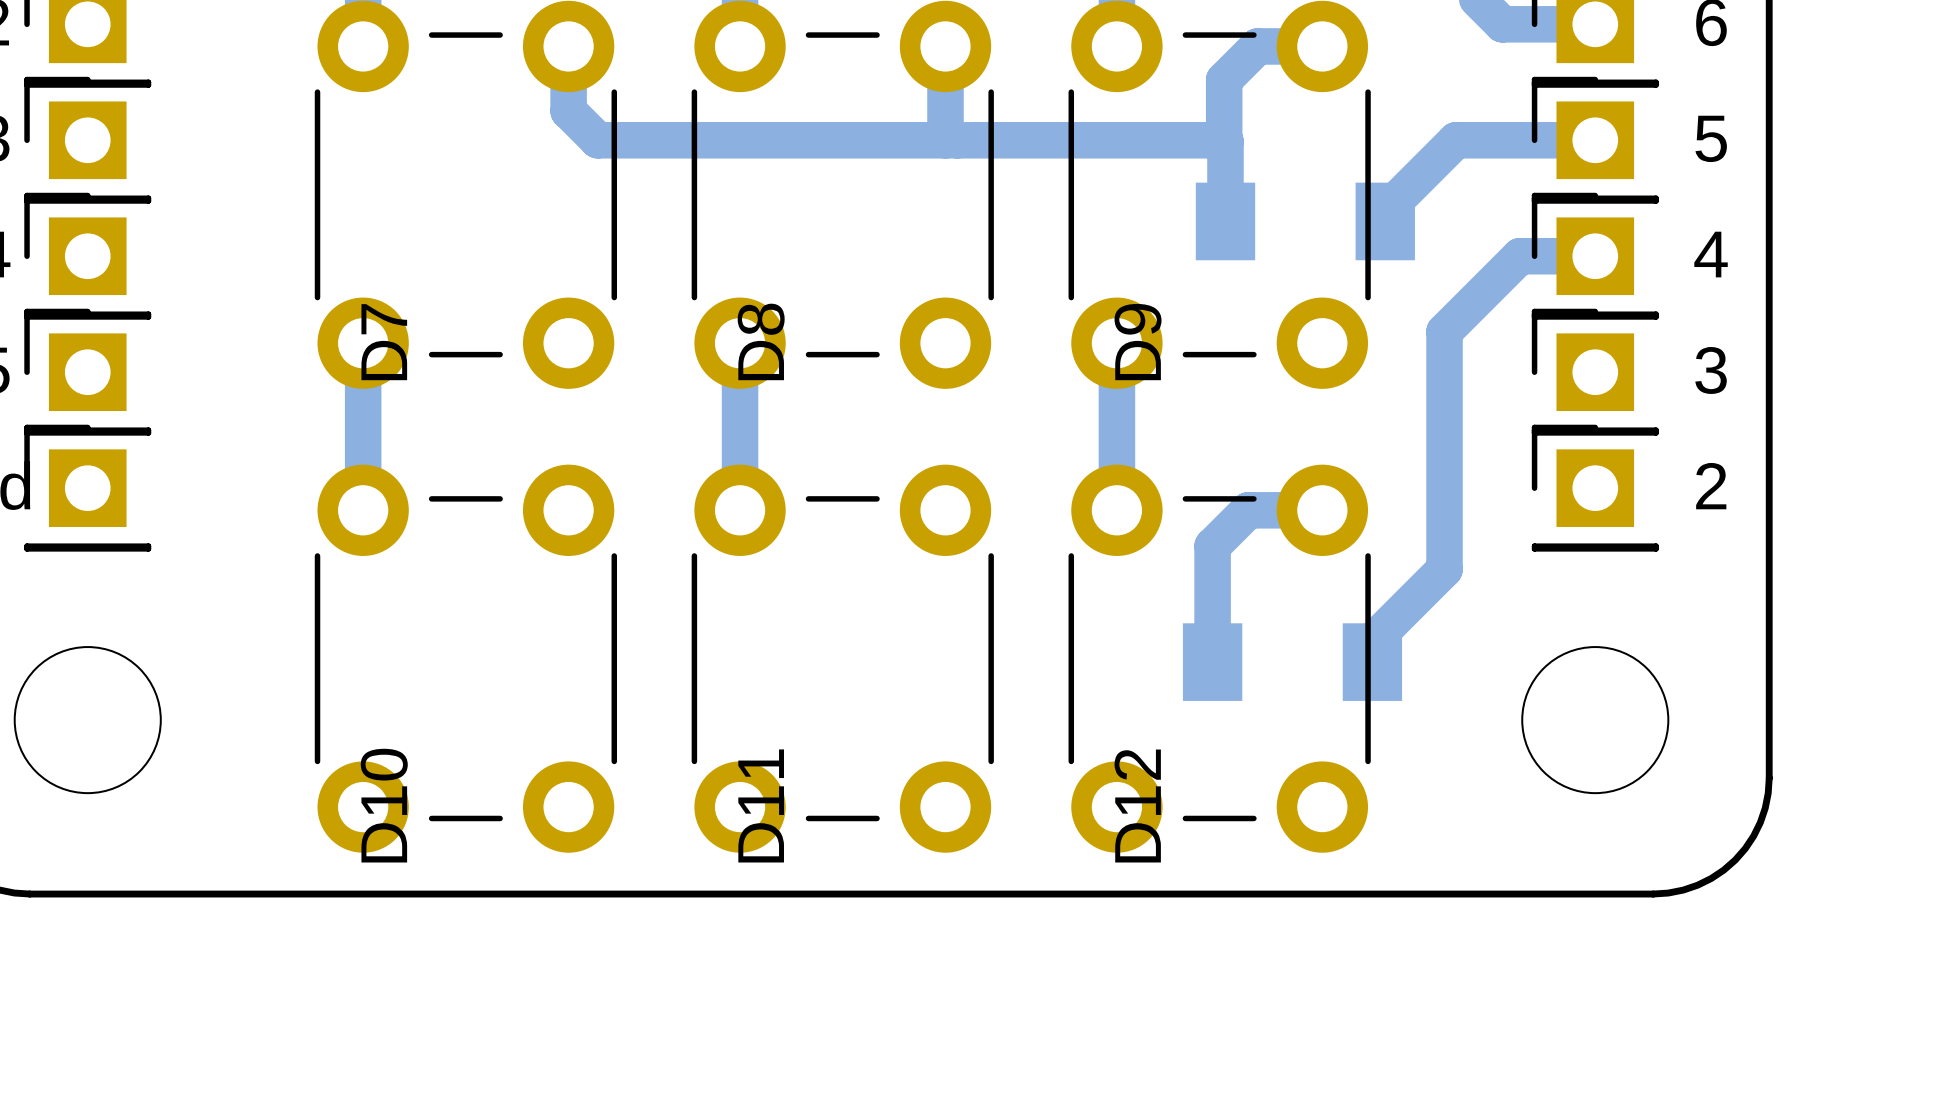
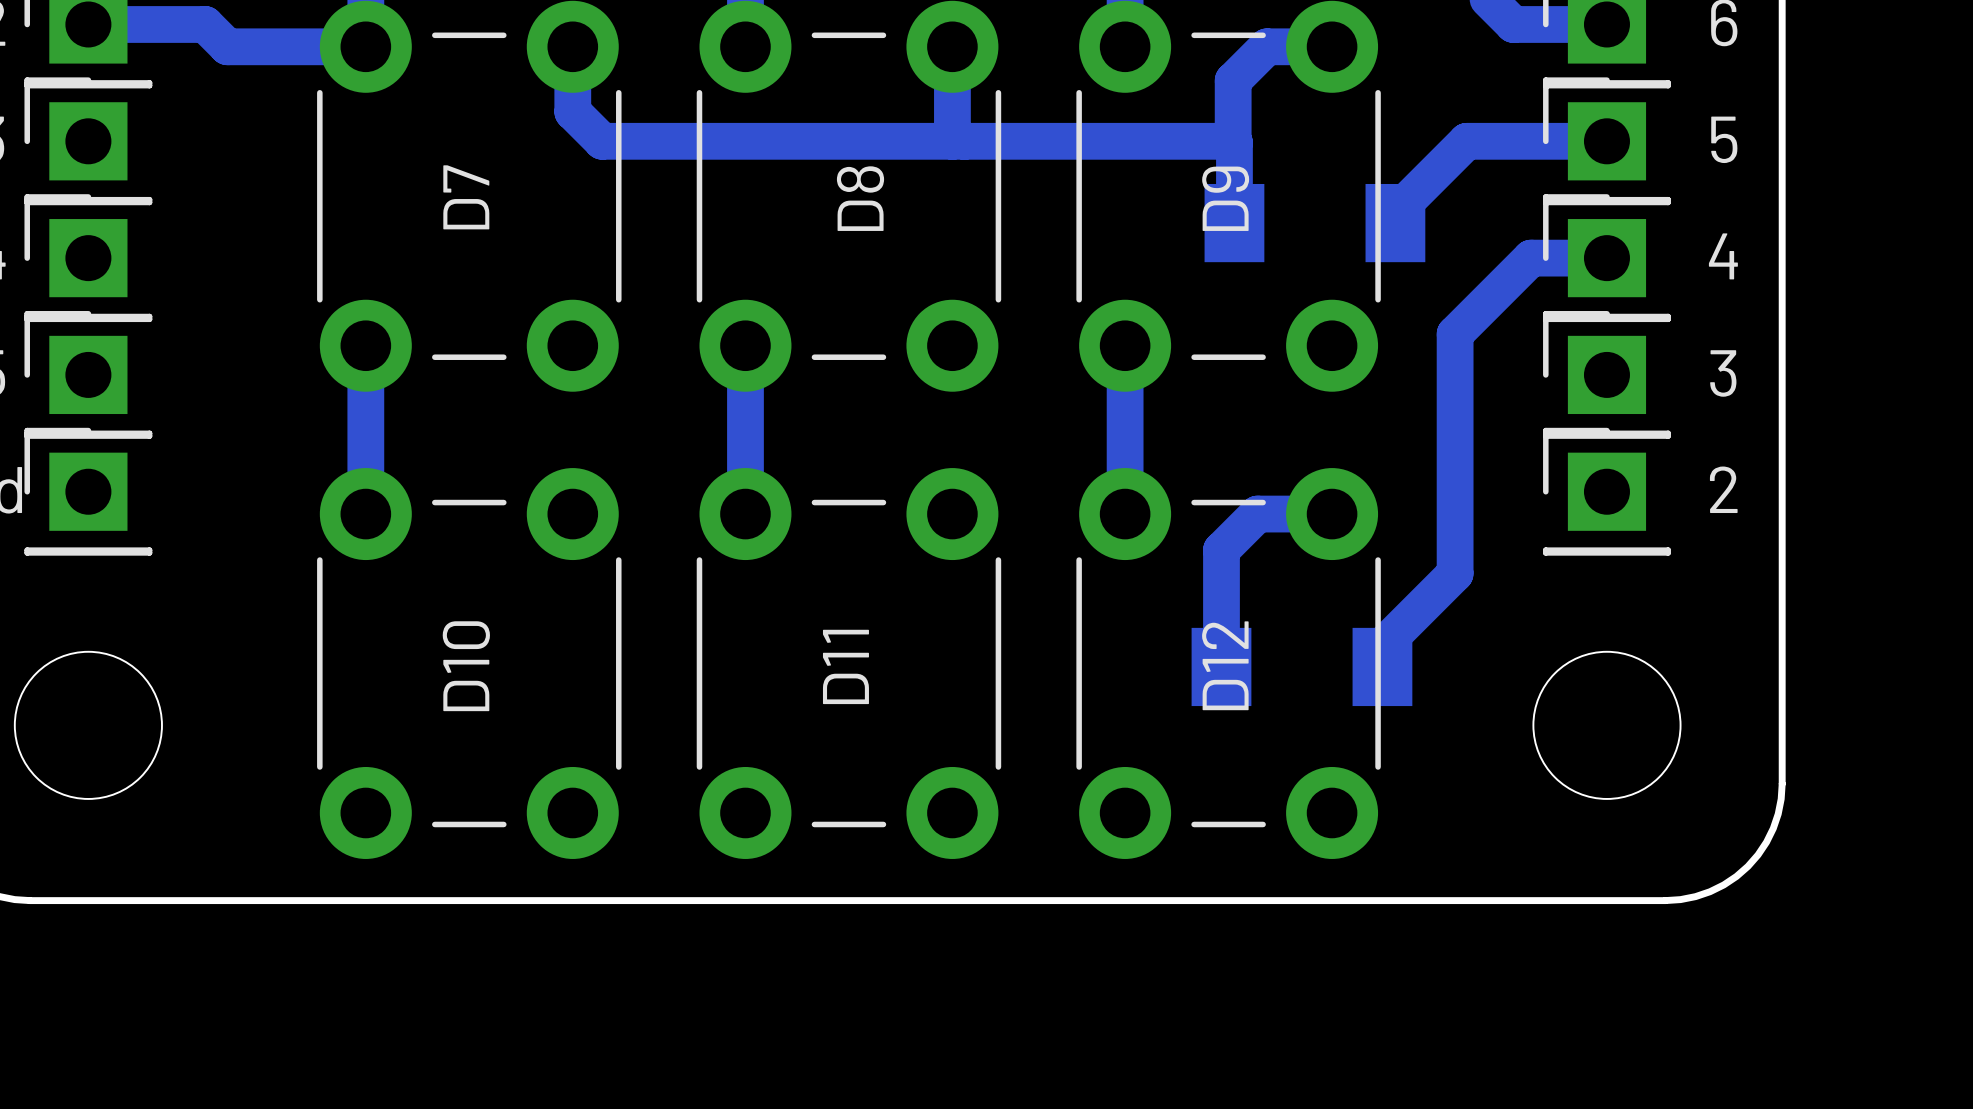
bottom track: none -> (88, 24) (205, 24) (227, 46) (365, 46)
D8 name position: D8 (761, 341) -> D8 (860, 198)
D7 name position: D7 (384, 342) -> D7 (466, 197)
D9 name position: D9 (1138, 342) -> D9 (1225, 198)
D10 name position: D10 (384, 805) -> D10 (466, 666)
D11 name position: D11 (761, 805) -> D11 (845, 666)
D12 name position: D12 (1137, 806) -> D12 (1225, 665)

